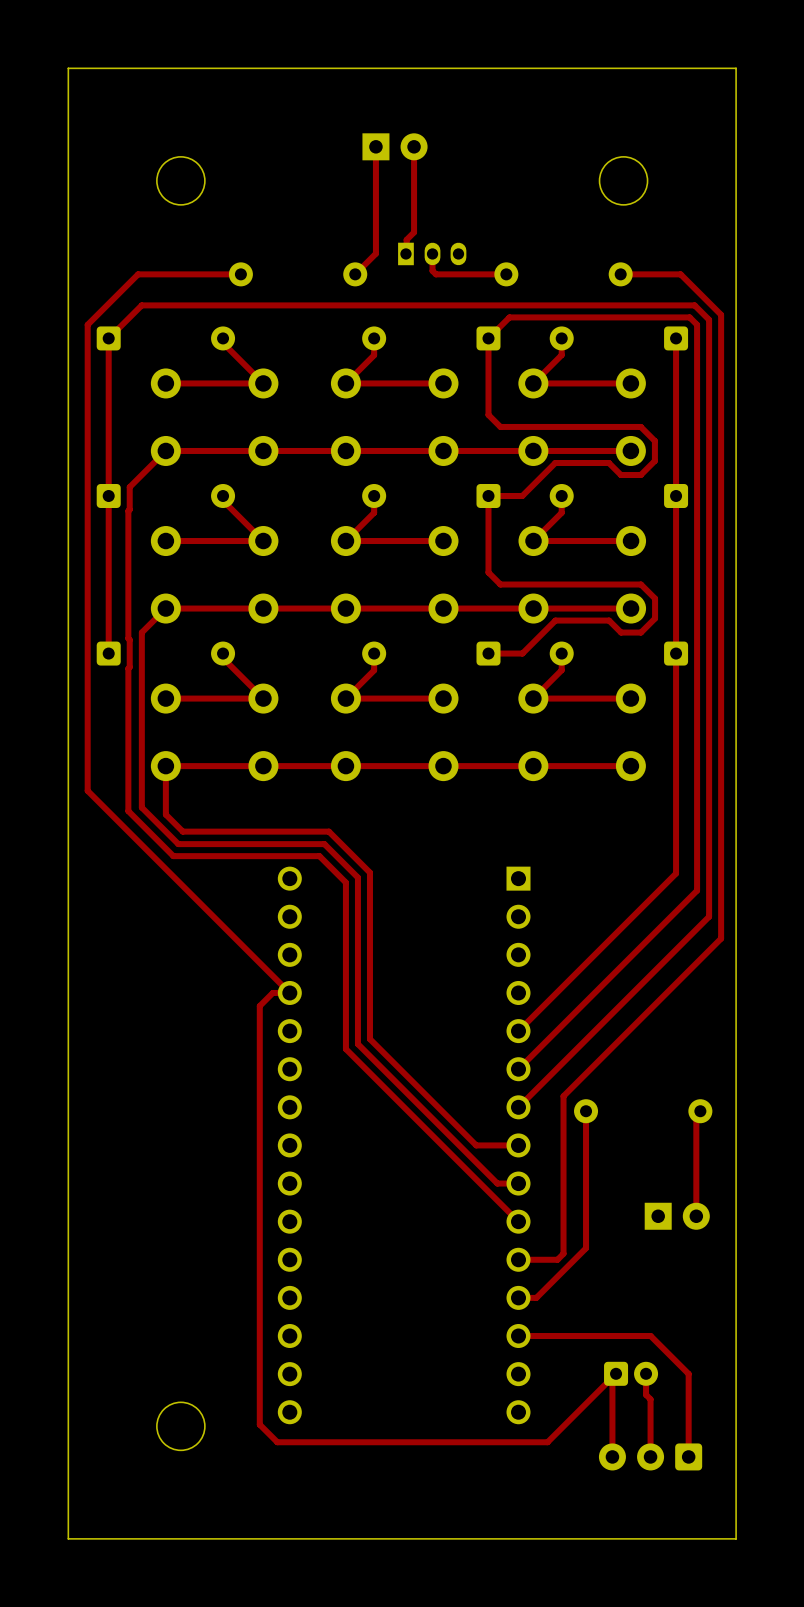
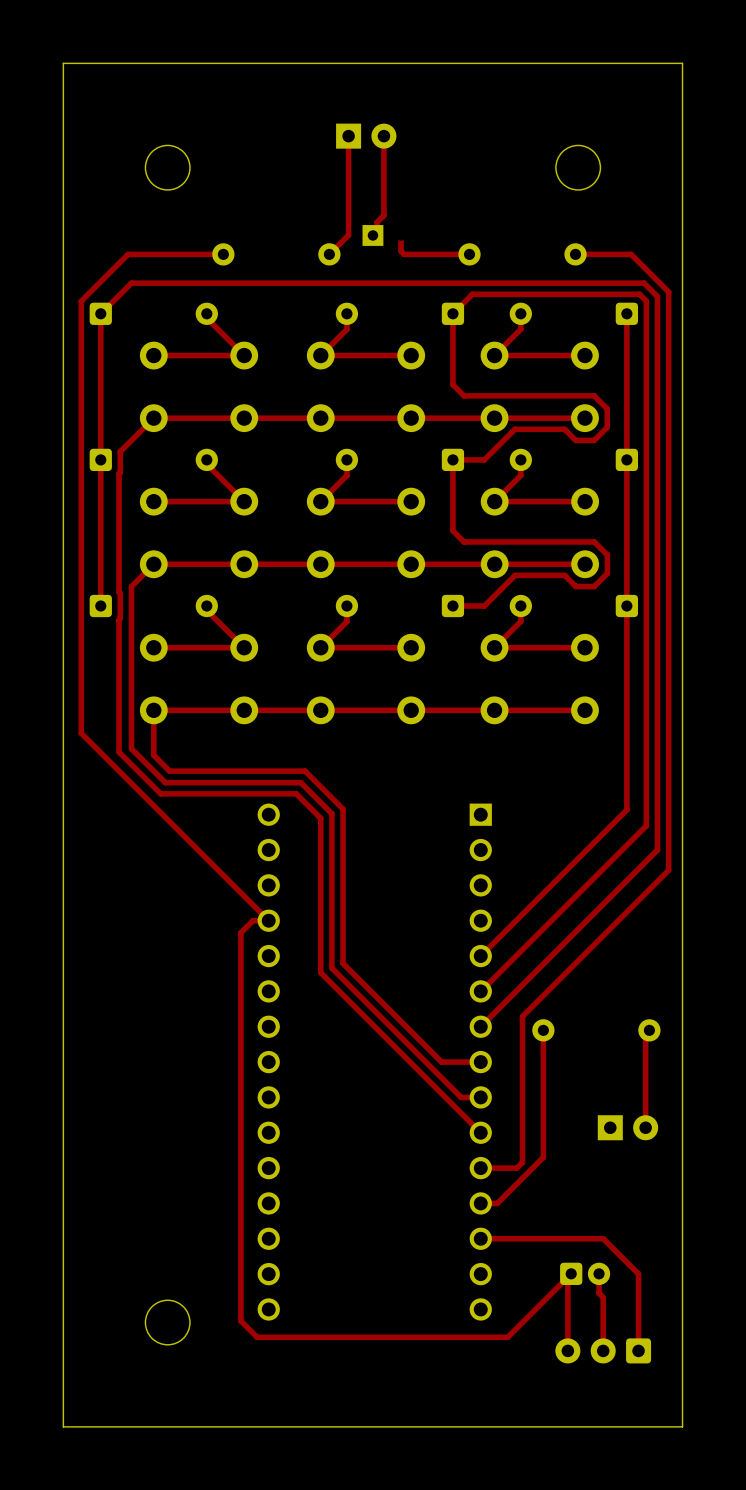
part footprint: [398, 242, 467, 266] -> [362, 225, 440, 246]

